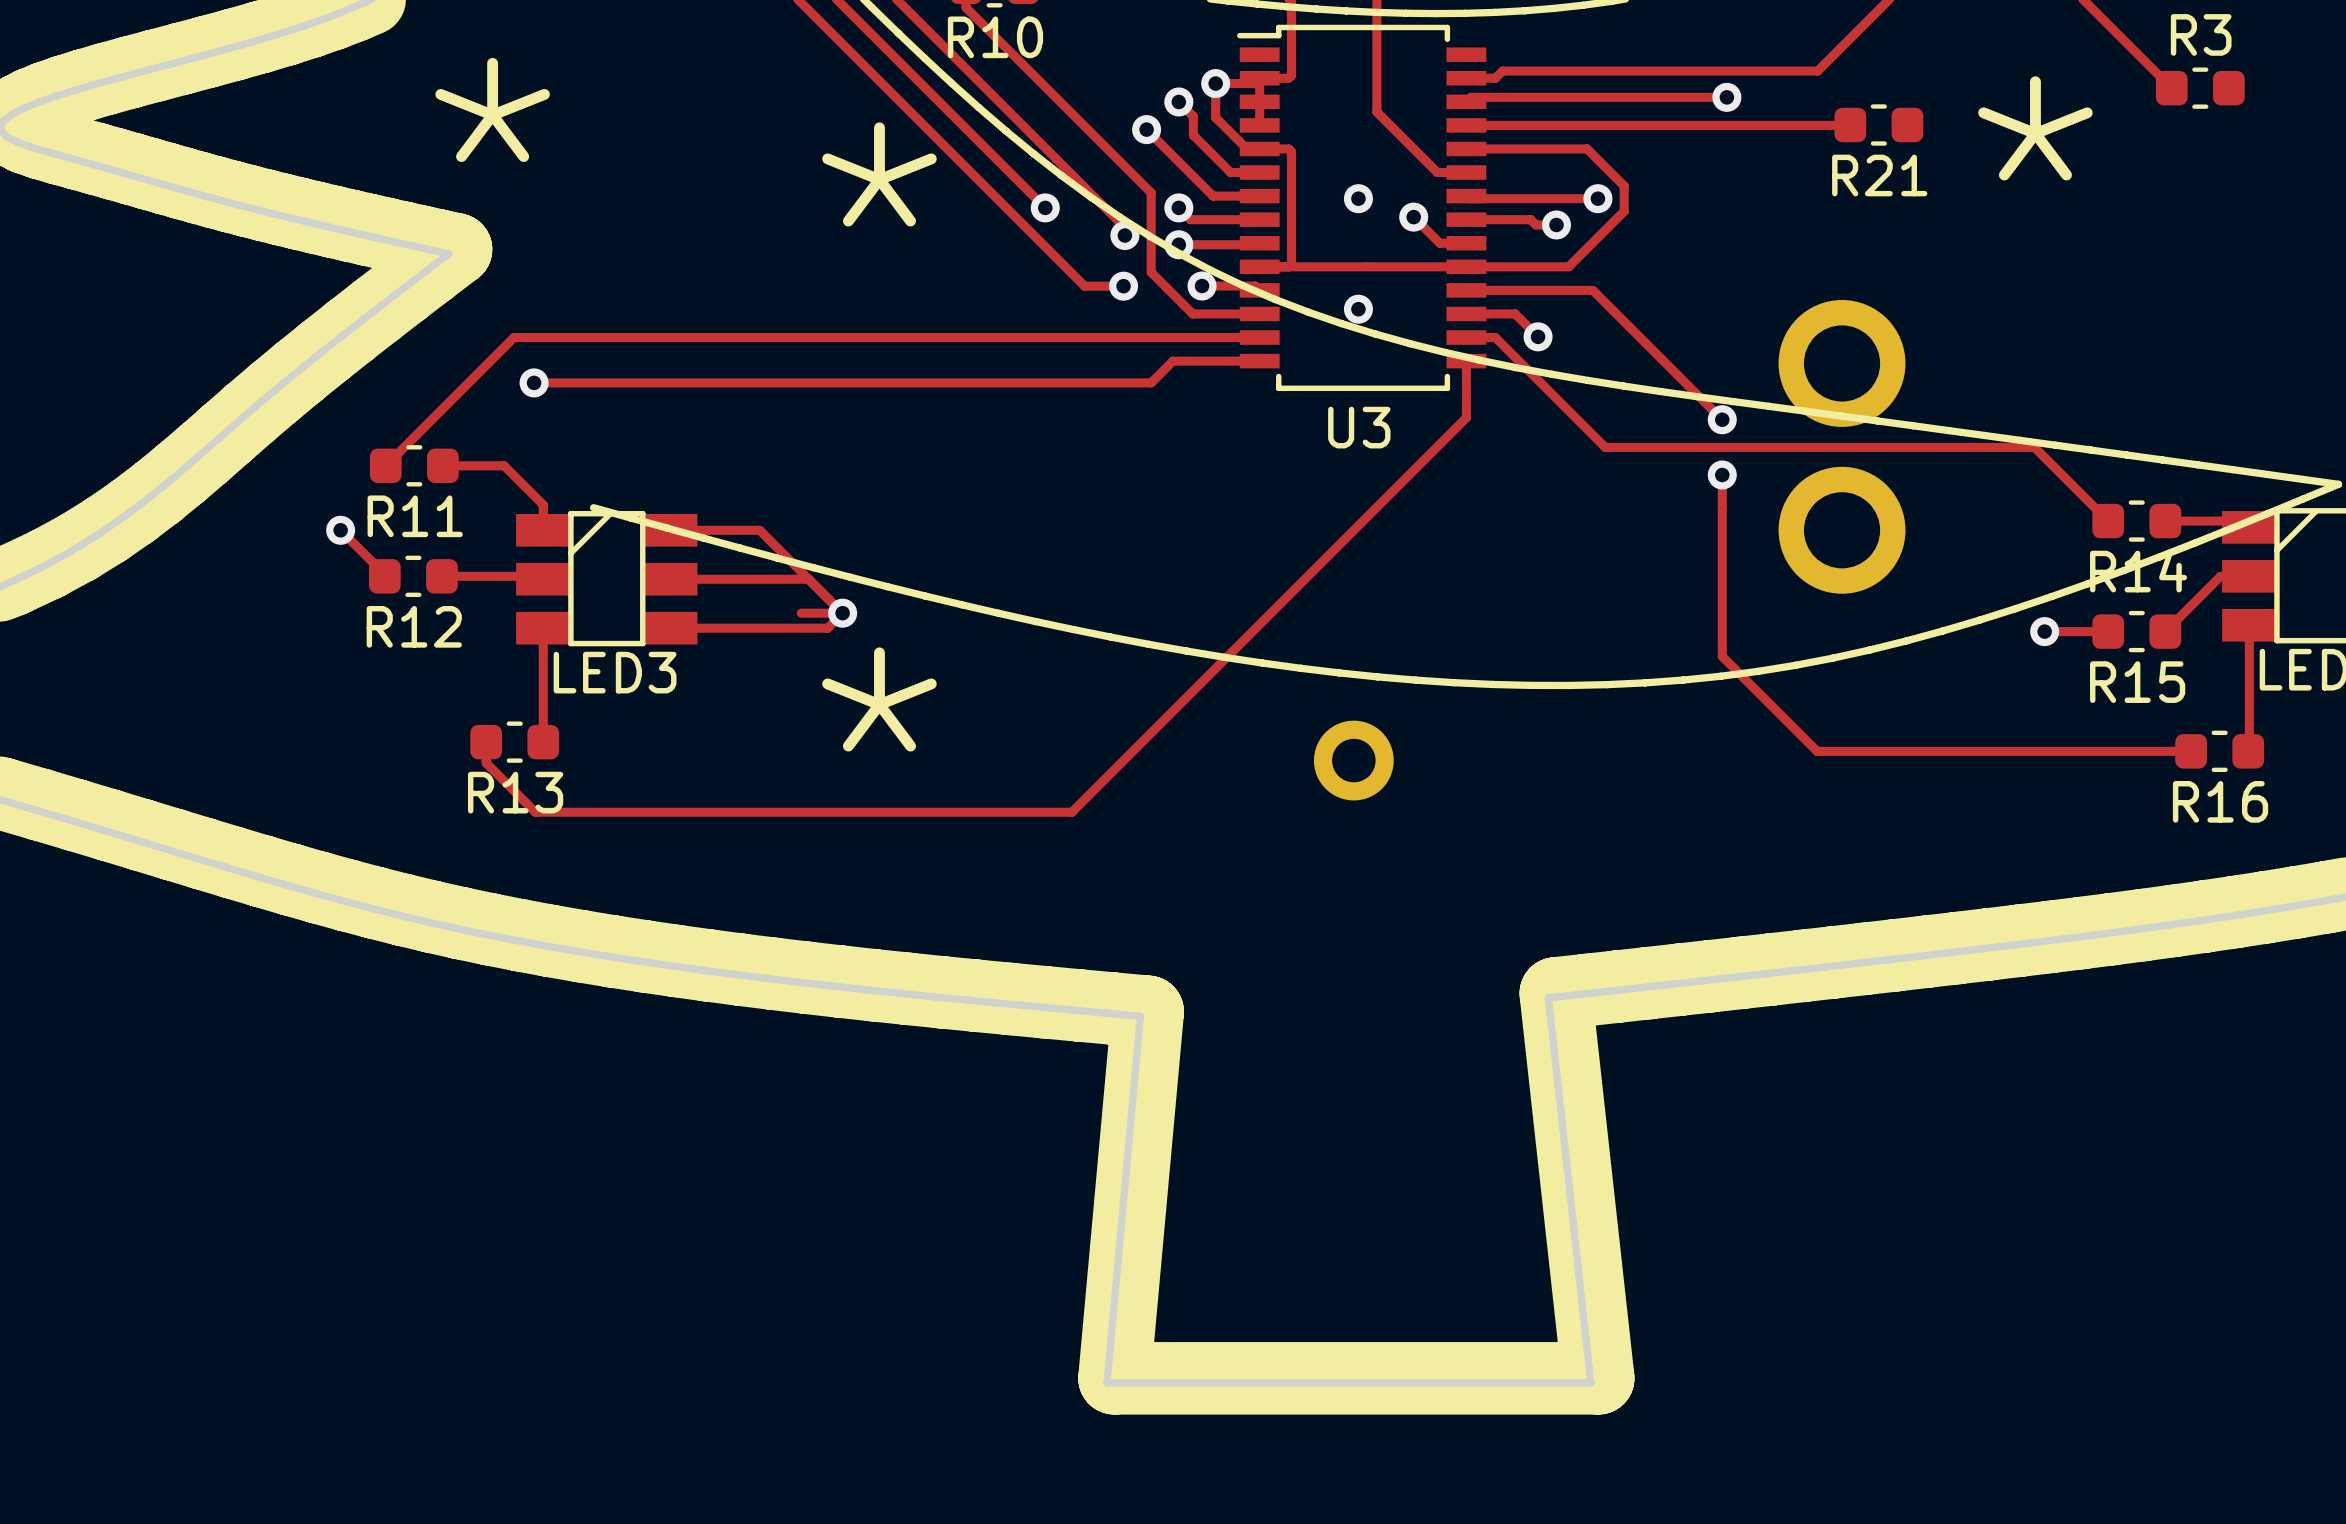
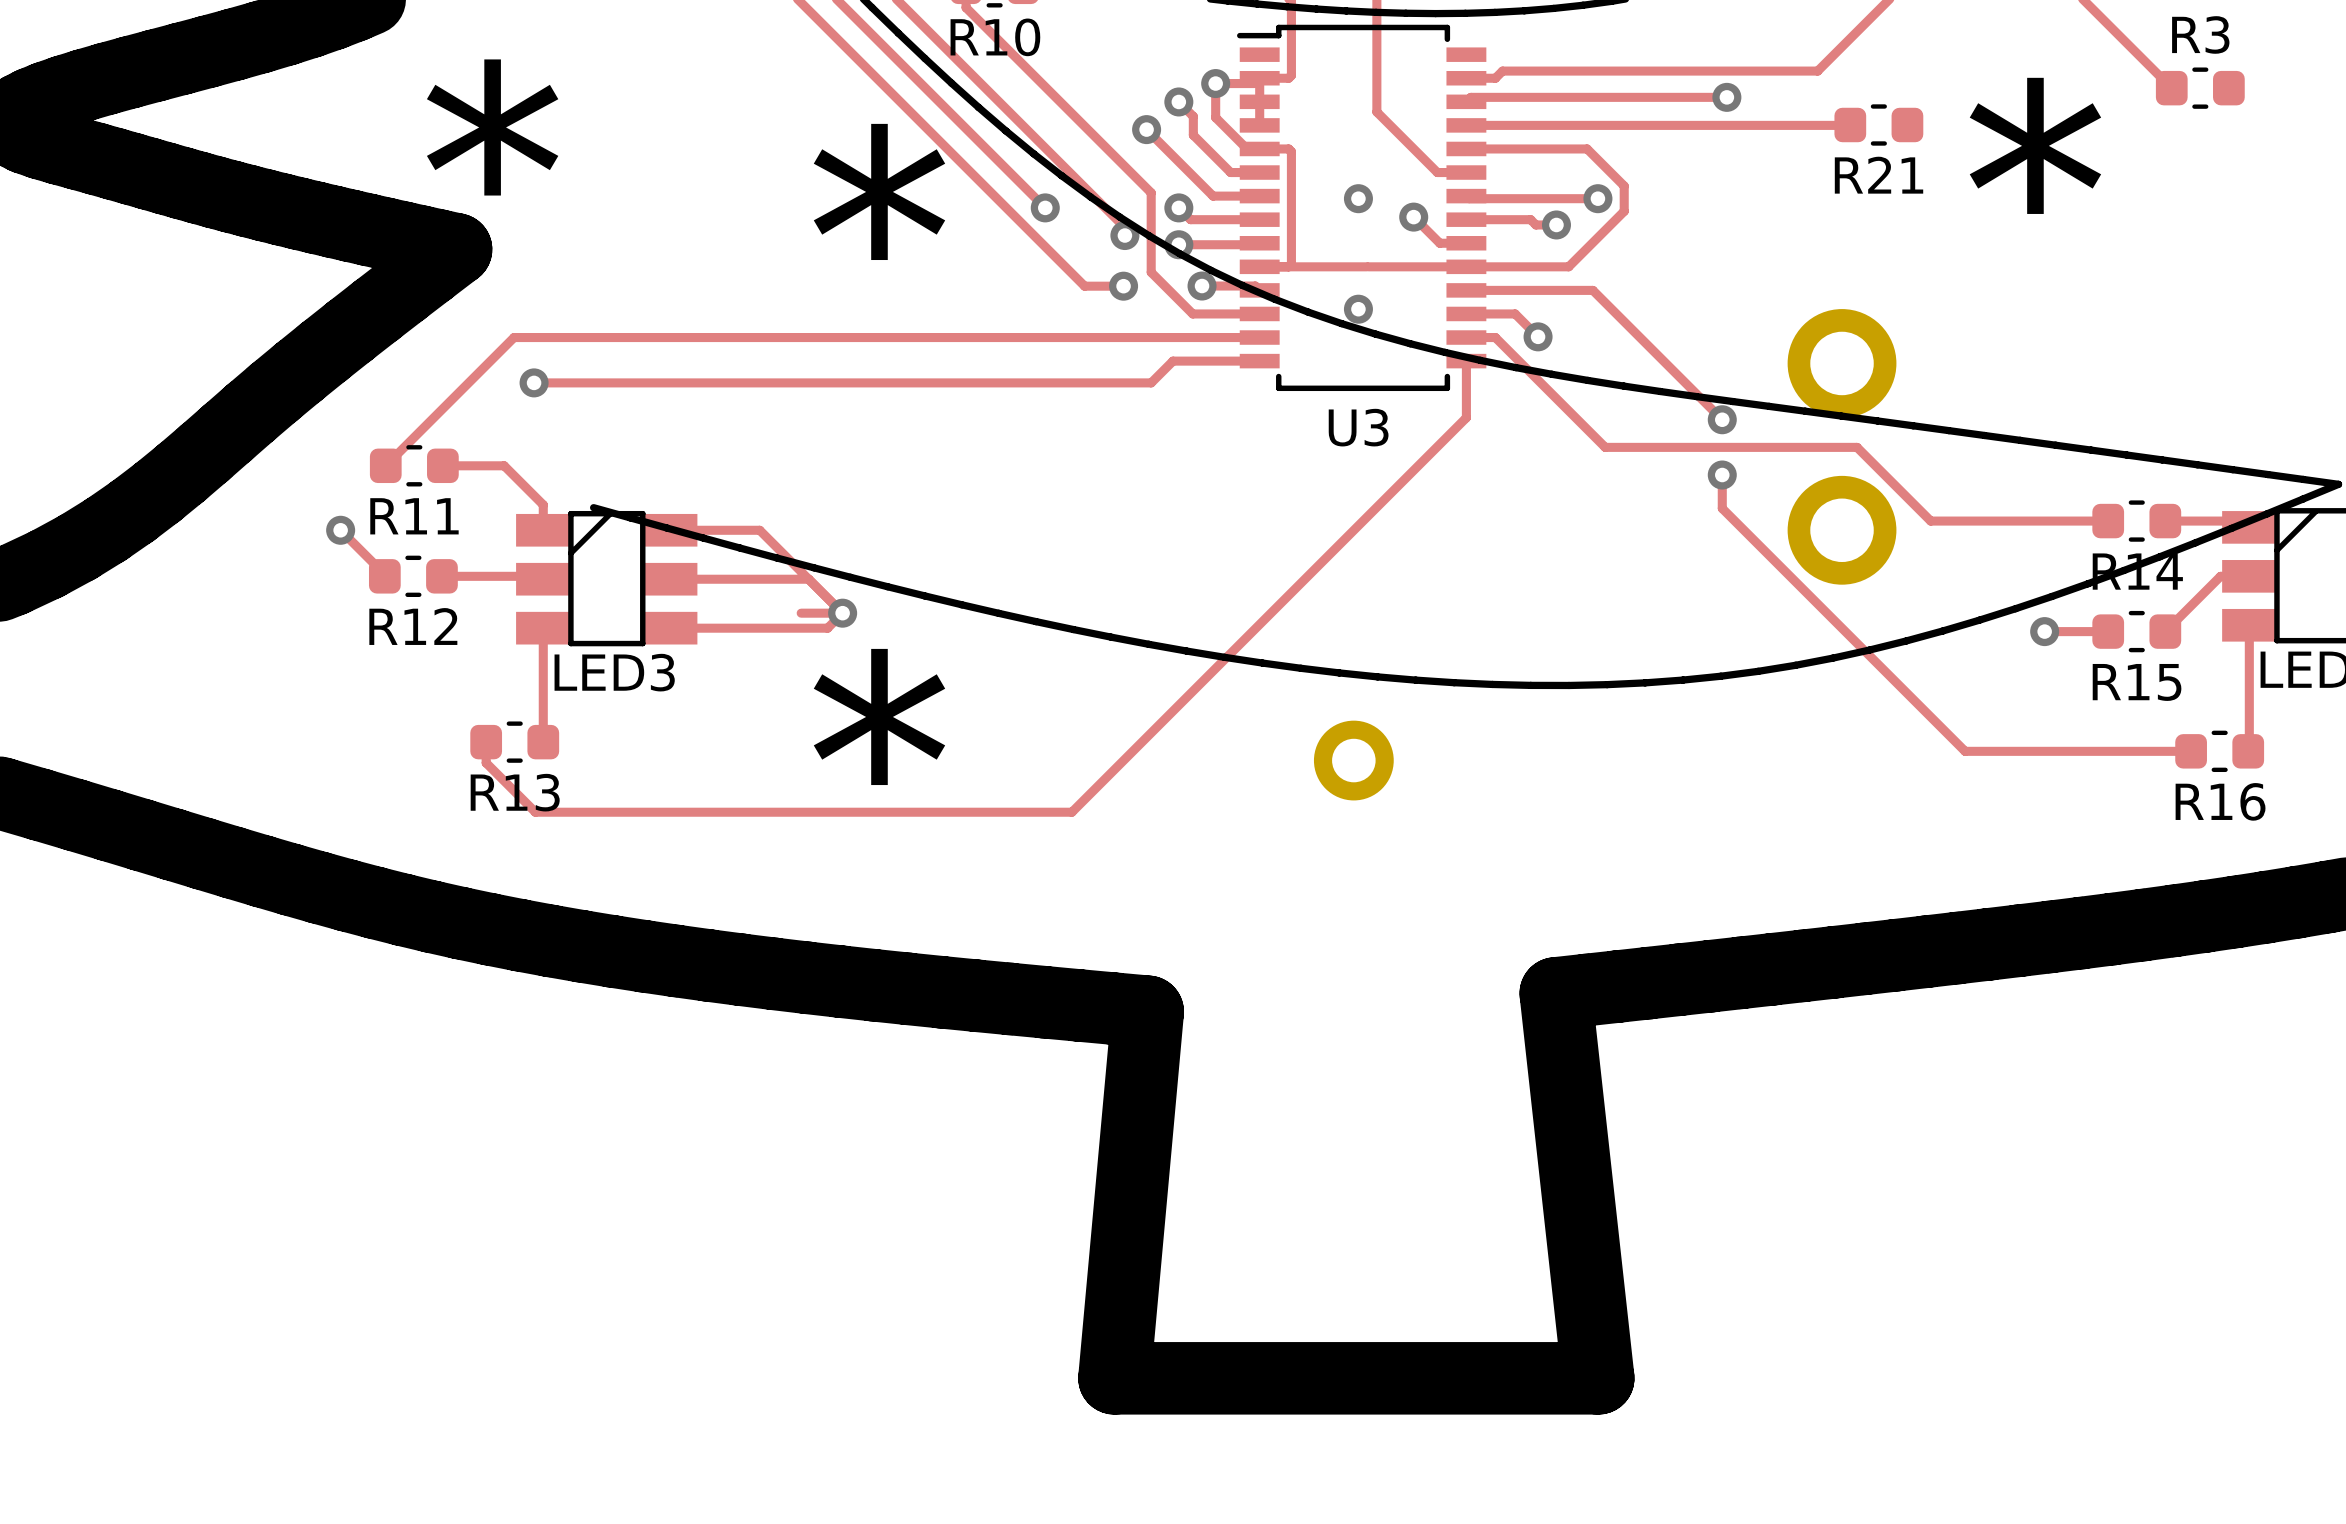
part footprint: [1778, 300, 1906, 594] -> [1787, 309, 1897, 585]
track: (1857, 447) (2034, 447) (2108, 521) -> (1857, 447) (1930, 521) (2108, 521)
track: (1722, 508) (1722, 656) (1817, 751) (1965, 751) -> (1722, 508) (1965, 751)

